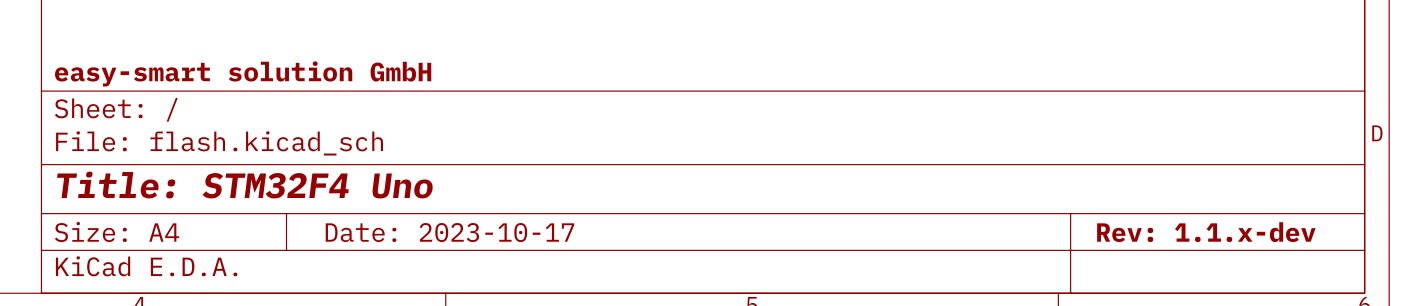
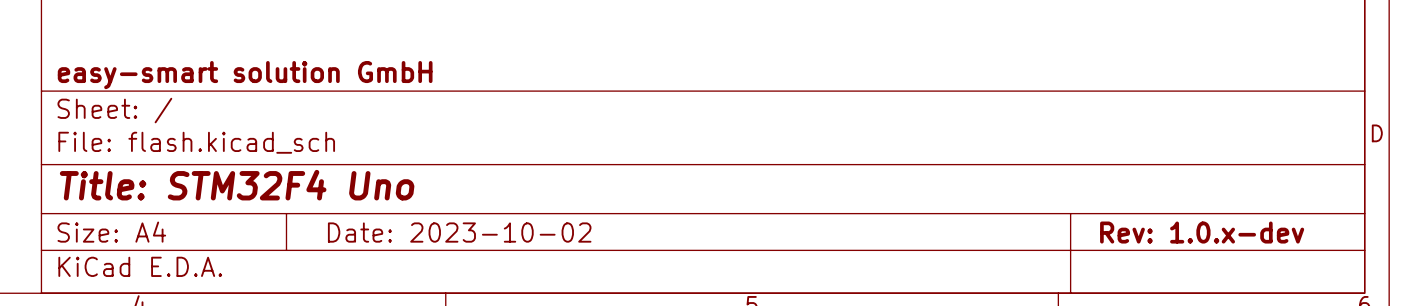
title block: Date: 2023-10-17 (449, 232) -> Date: 2023-10-02 (459, 232)
title block: Rev: 1.1.x-dev (1206, 232) -> Rev: 1.0.x-dev (1202, 232)

